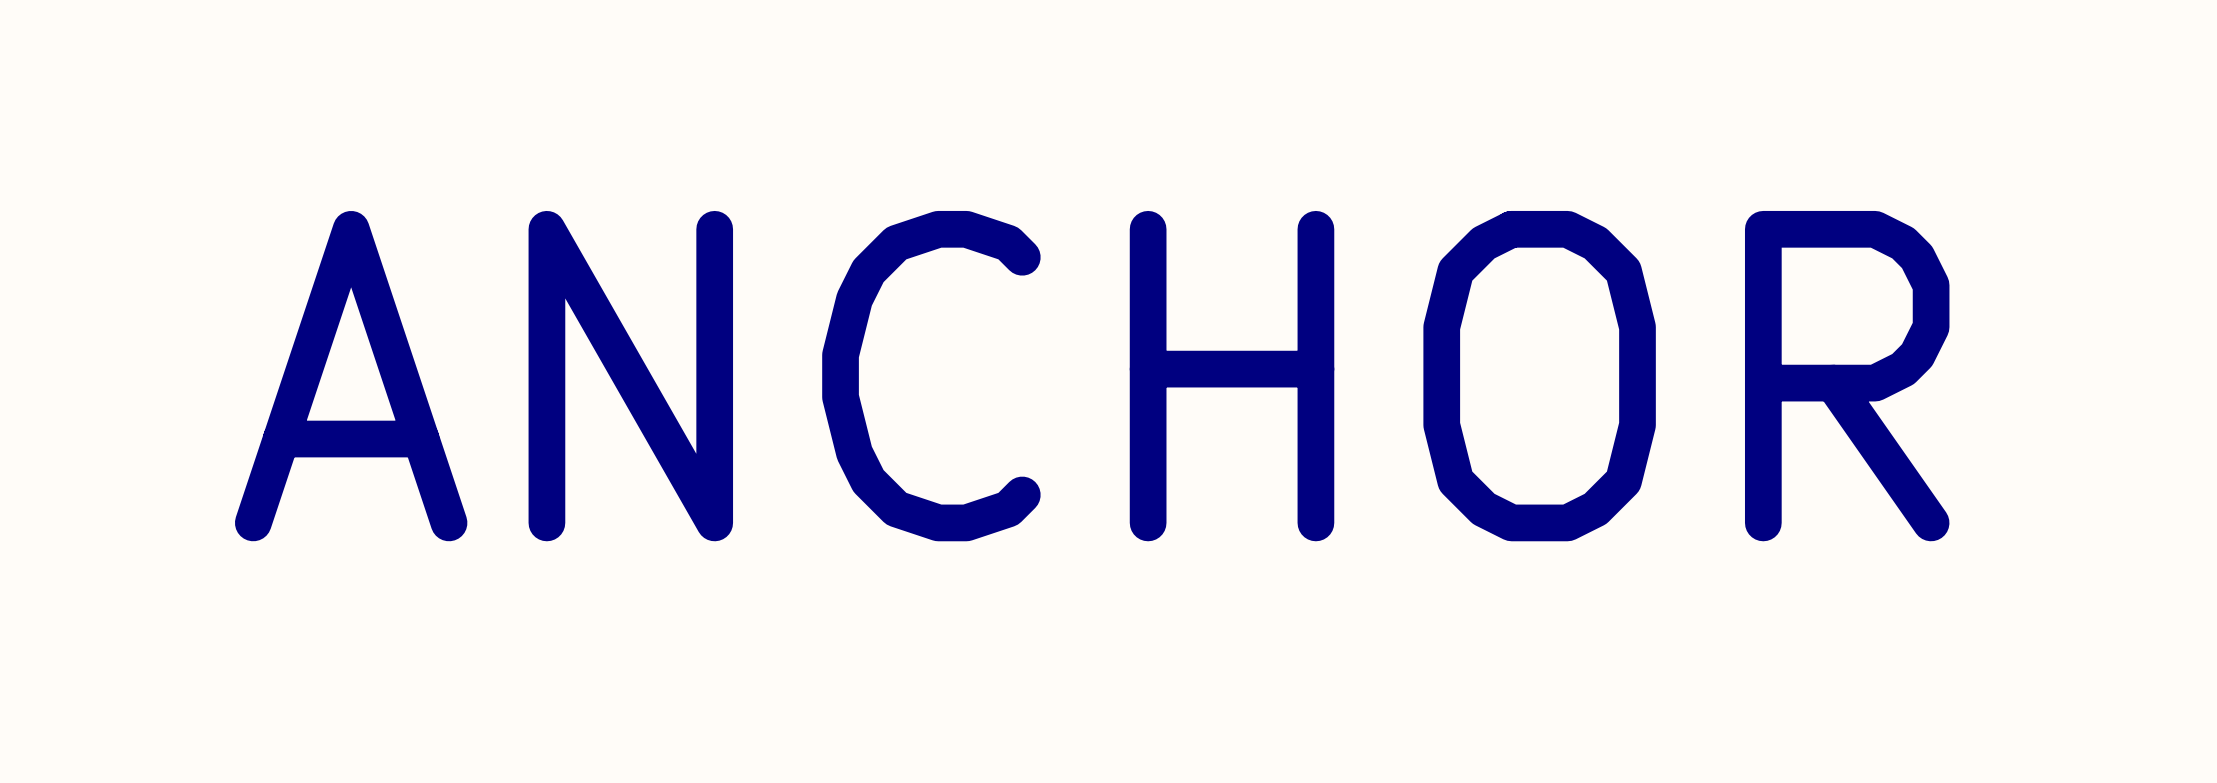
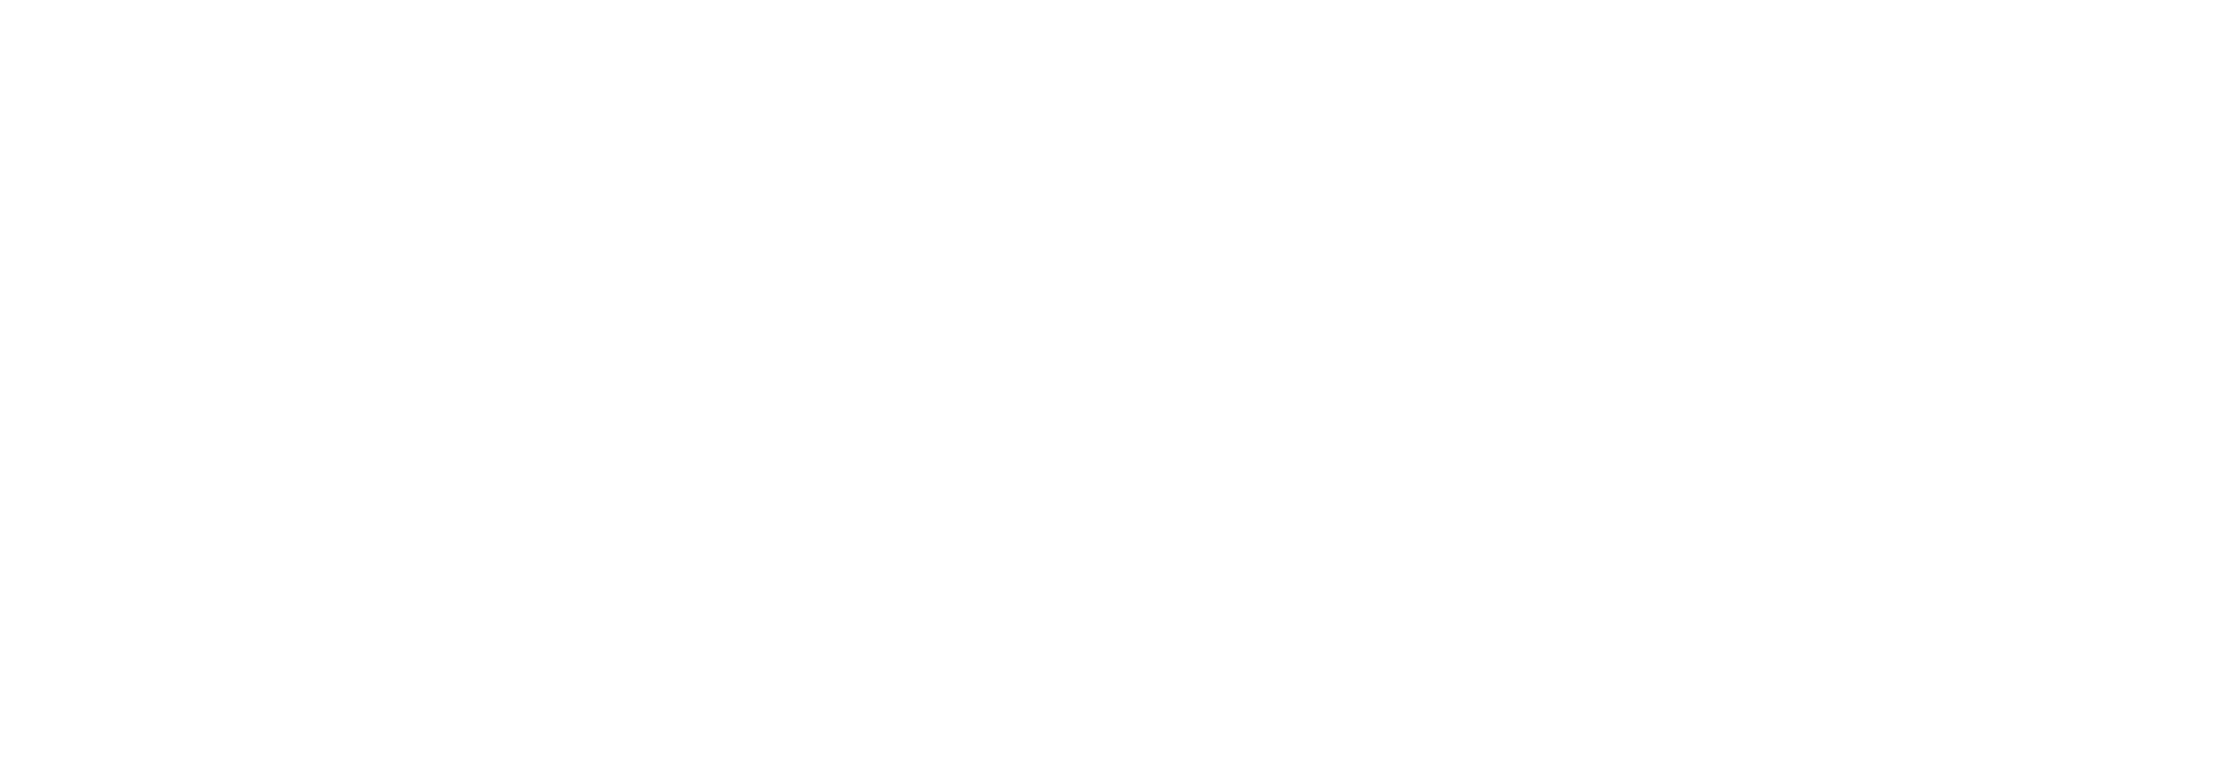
text: ANCHOR (1092, 376) -> none

